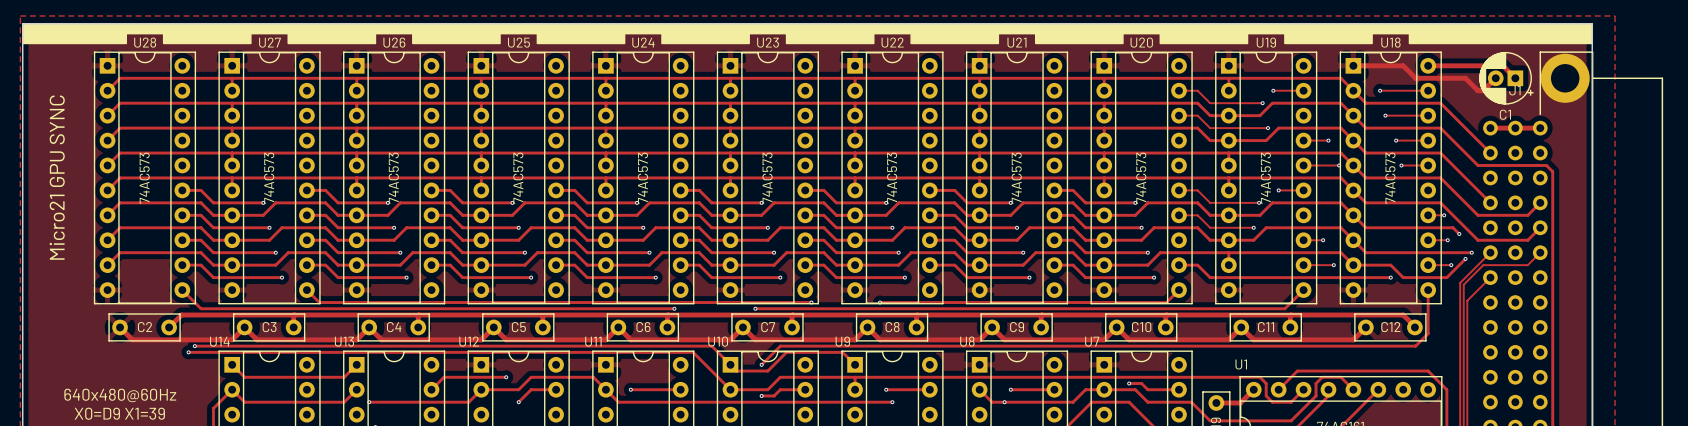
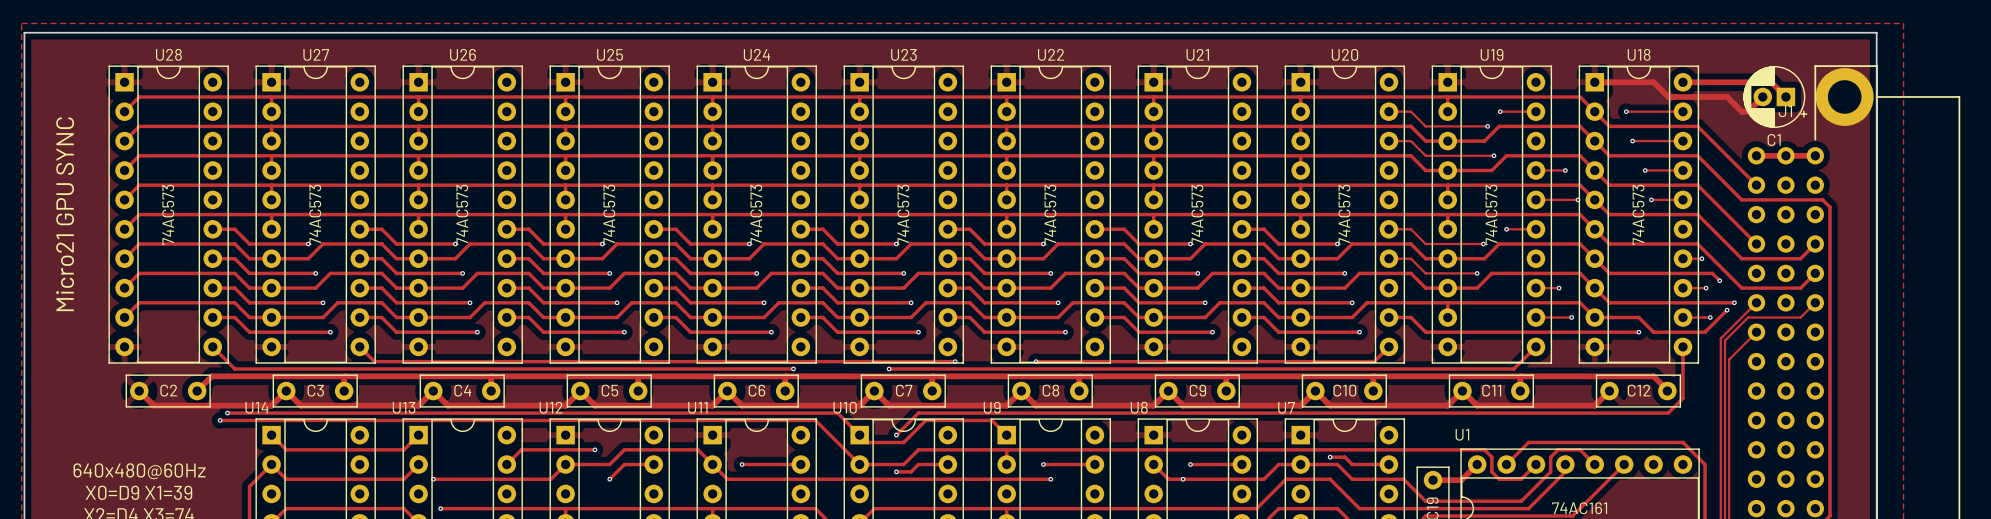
drawing: [22, 23, 1594, 45] -> none

